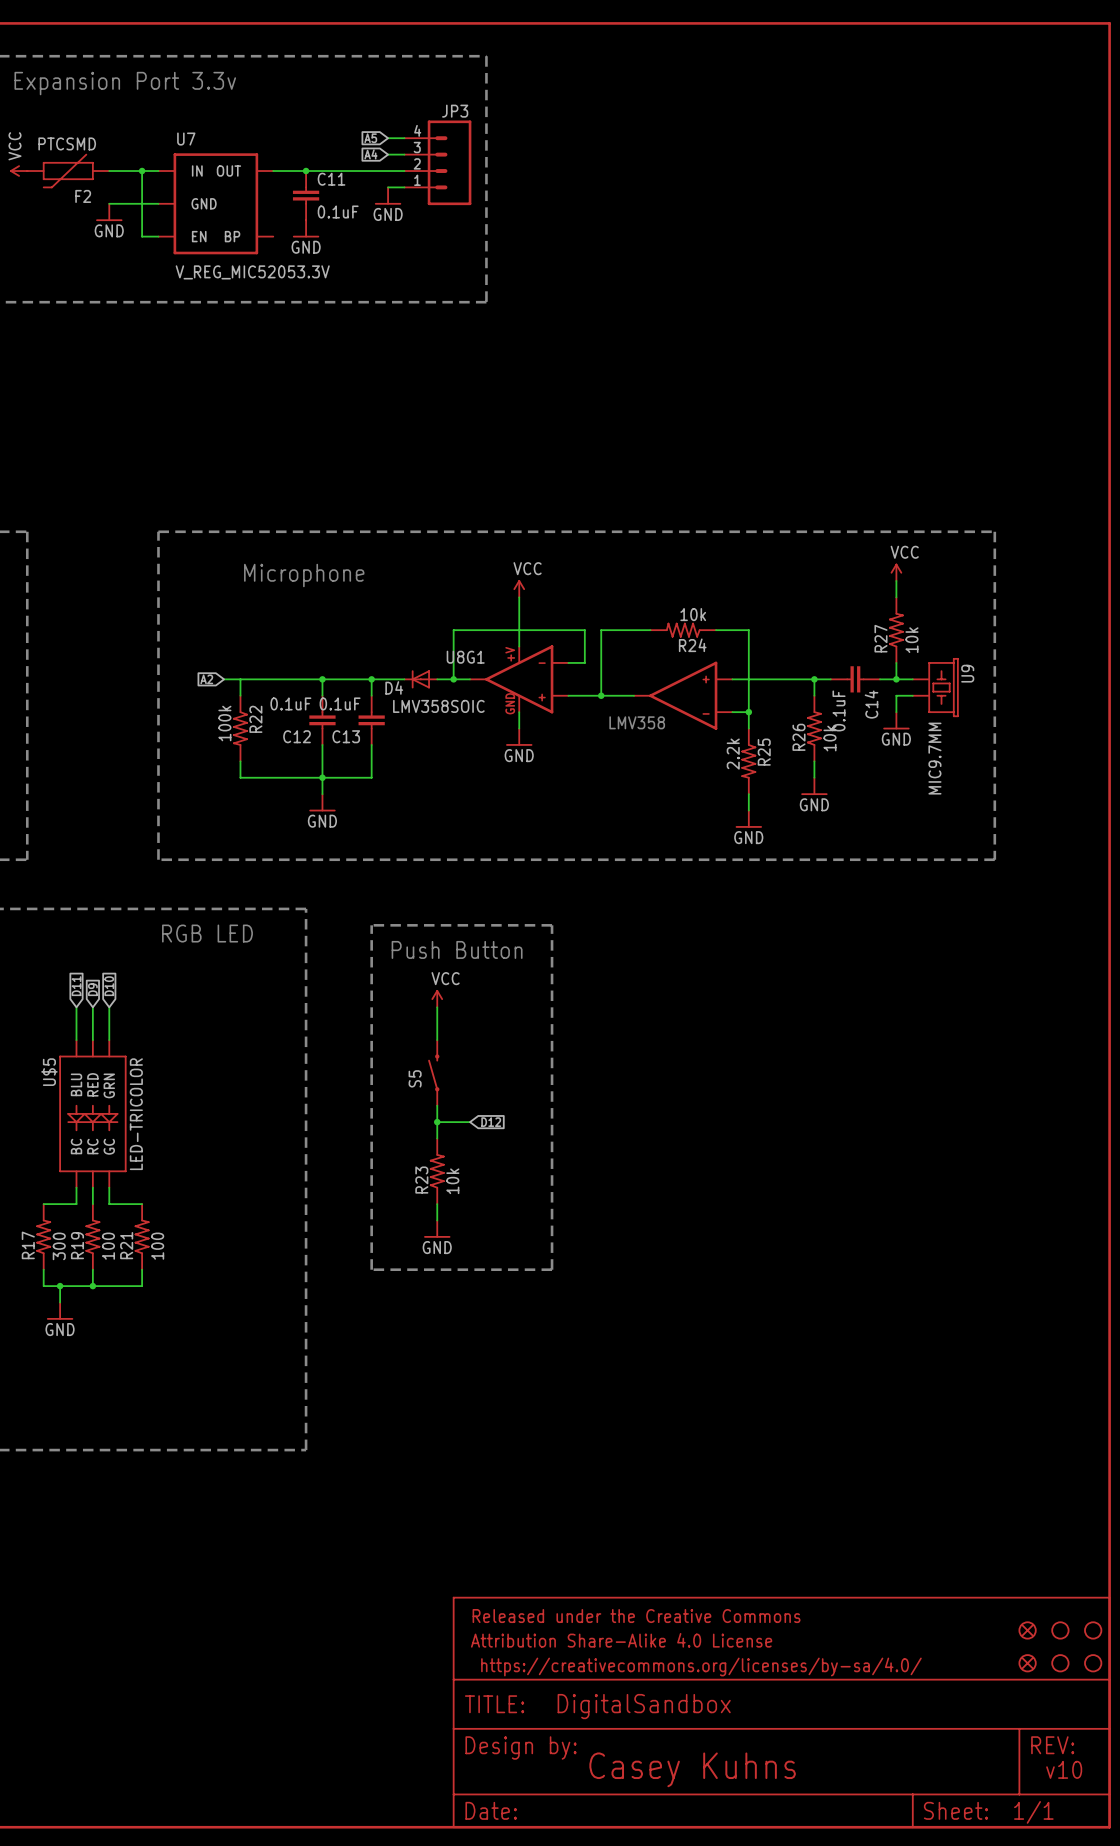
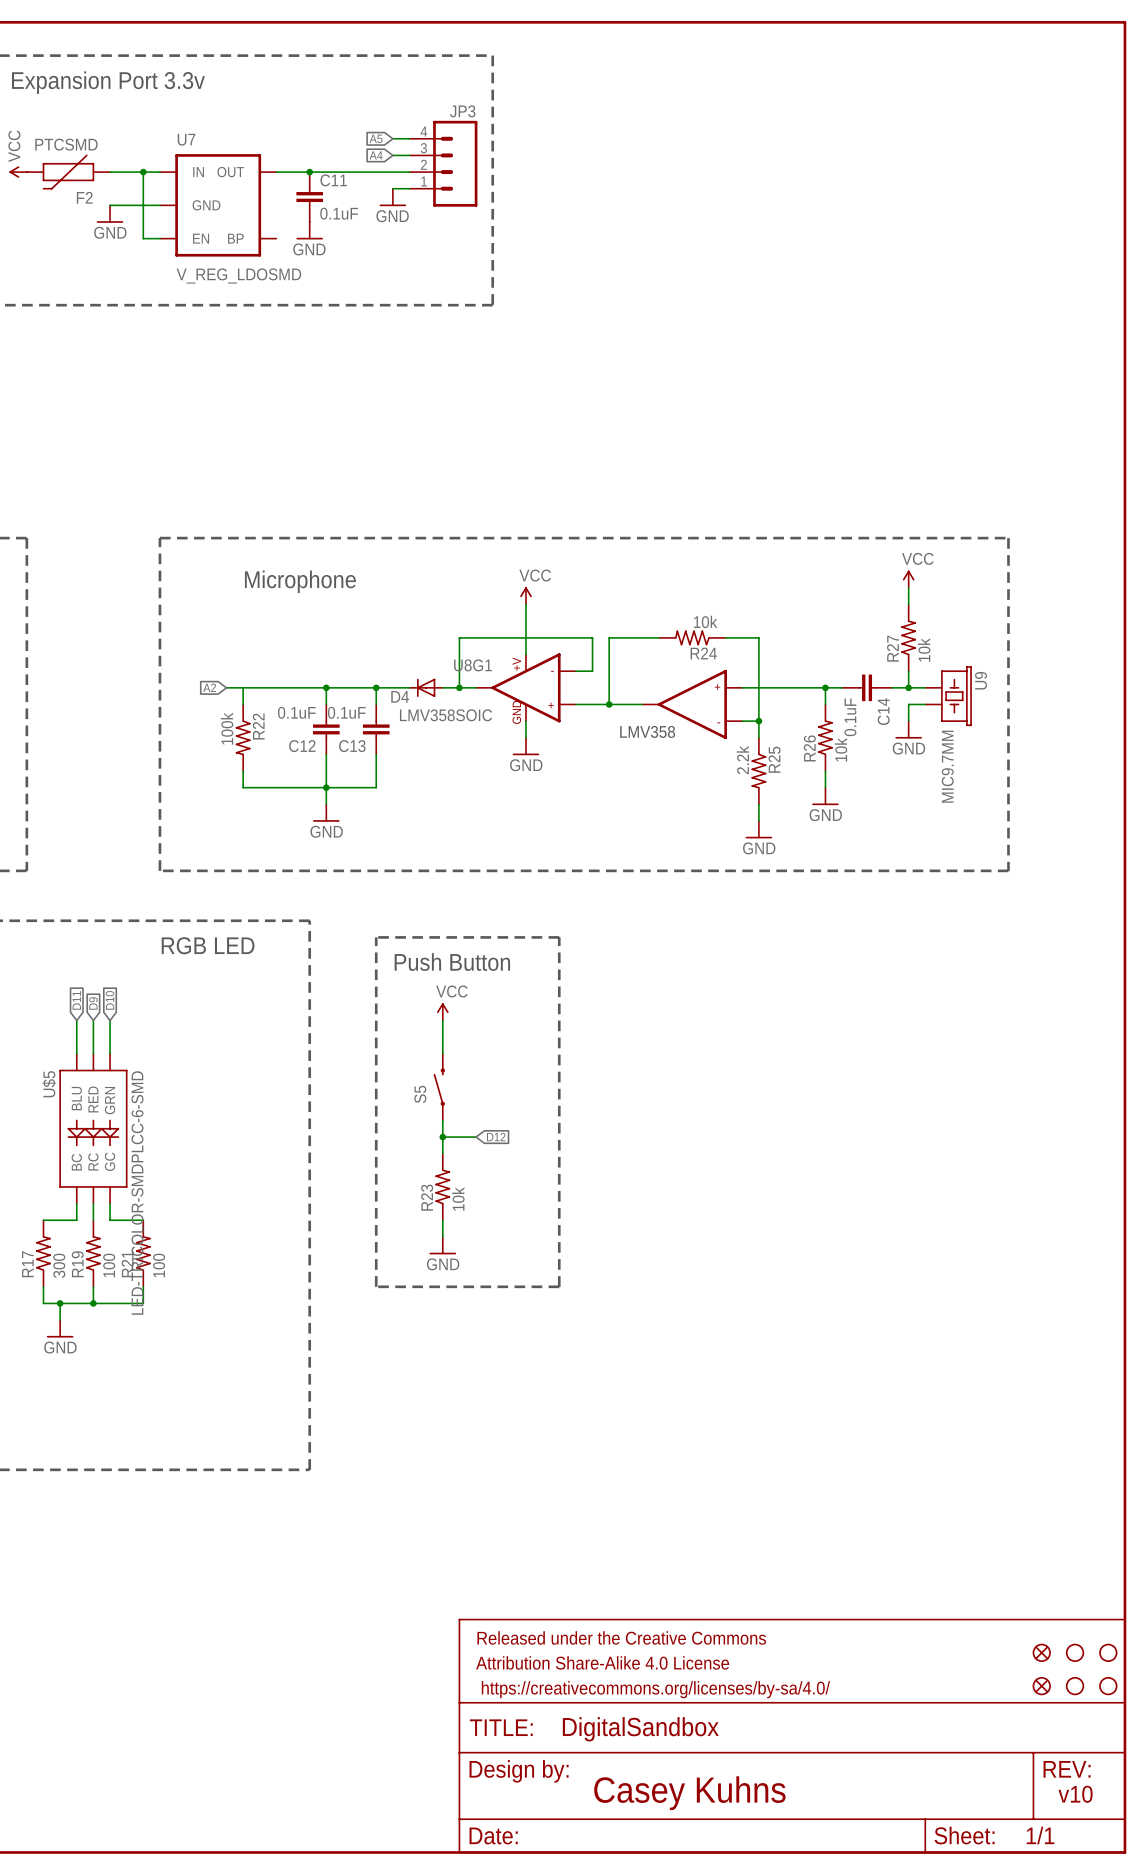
U7 value: V_REG_MIC52053.3V (252, 272) -> V_REG_LDOSMD (238, 275)
U$5 value: LED-TRICOLOR (136, 1114) -> LED-TRICOLOR-SMDPLCC-6-SMD (137, 1193)

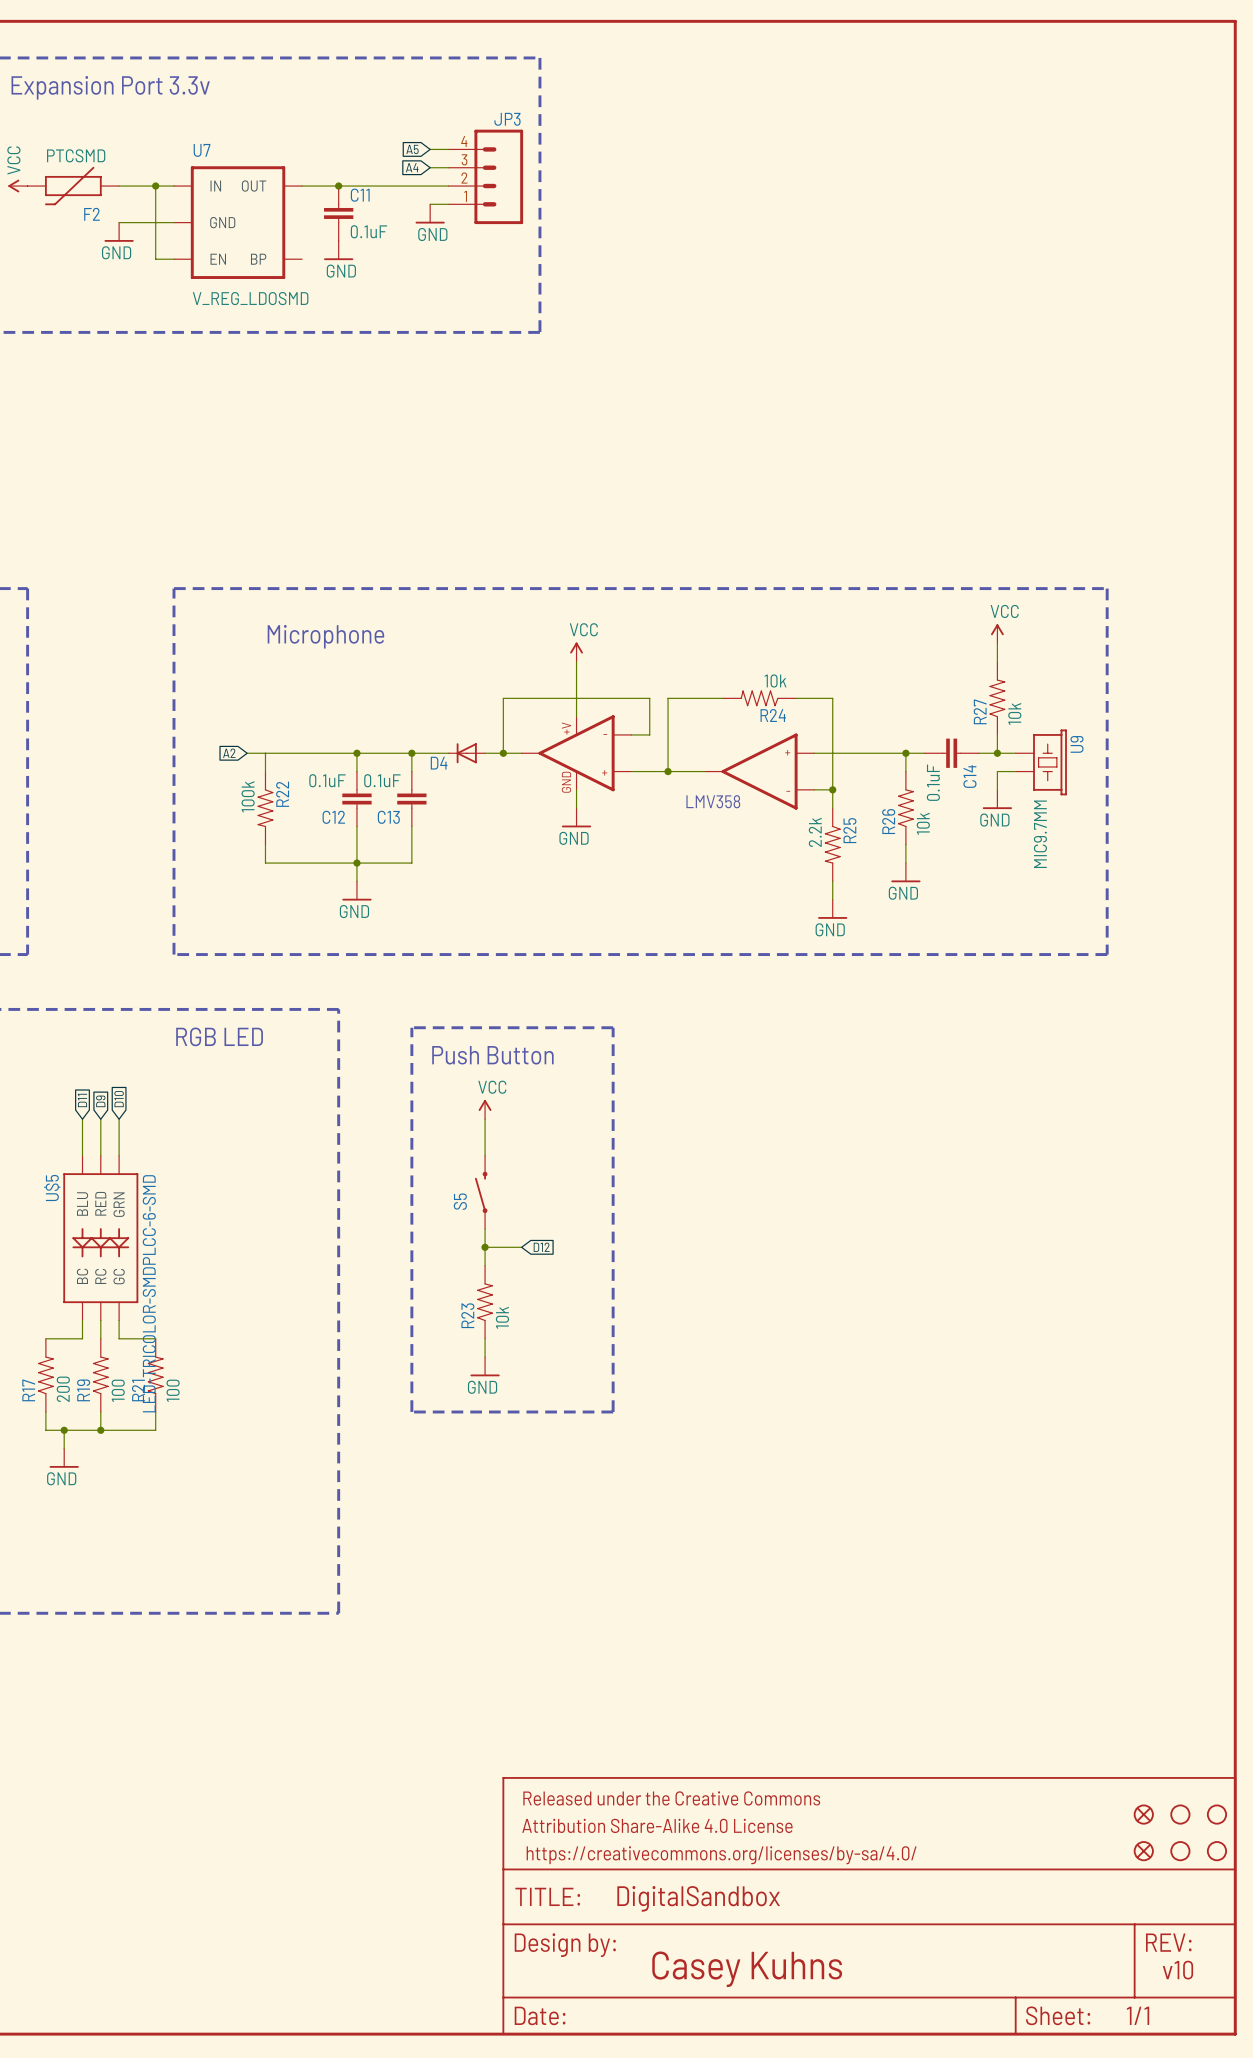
U8G1 name: U8G1 (473, 665) -> none
U8G1 value: LMV358SOIC (446, 715) -> none
R17 value: 300 (59, 1265) -> 200 (63, 1389)

